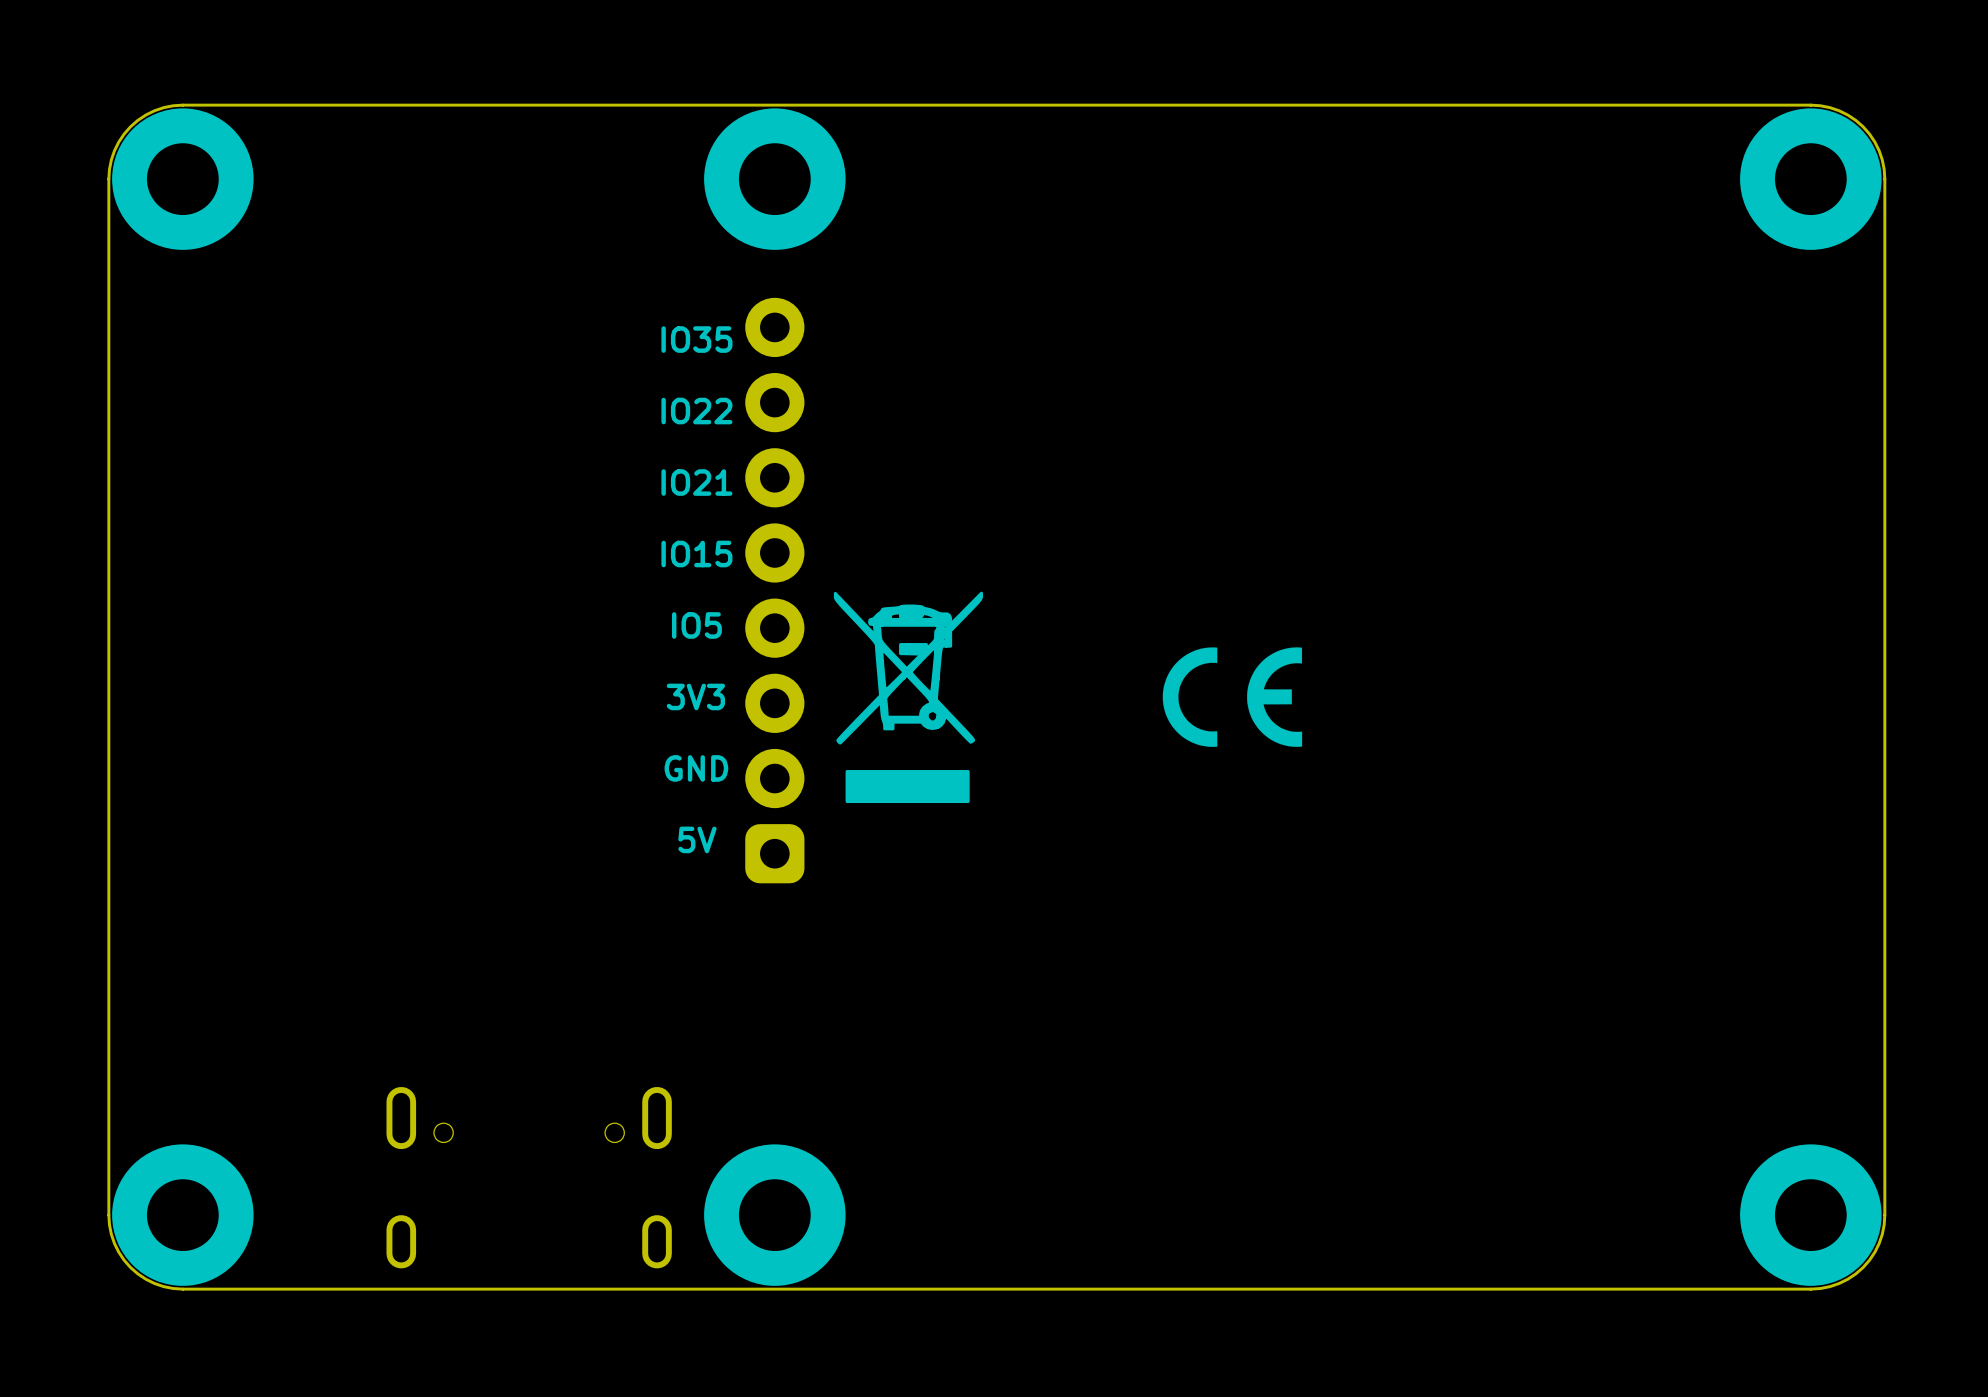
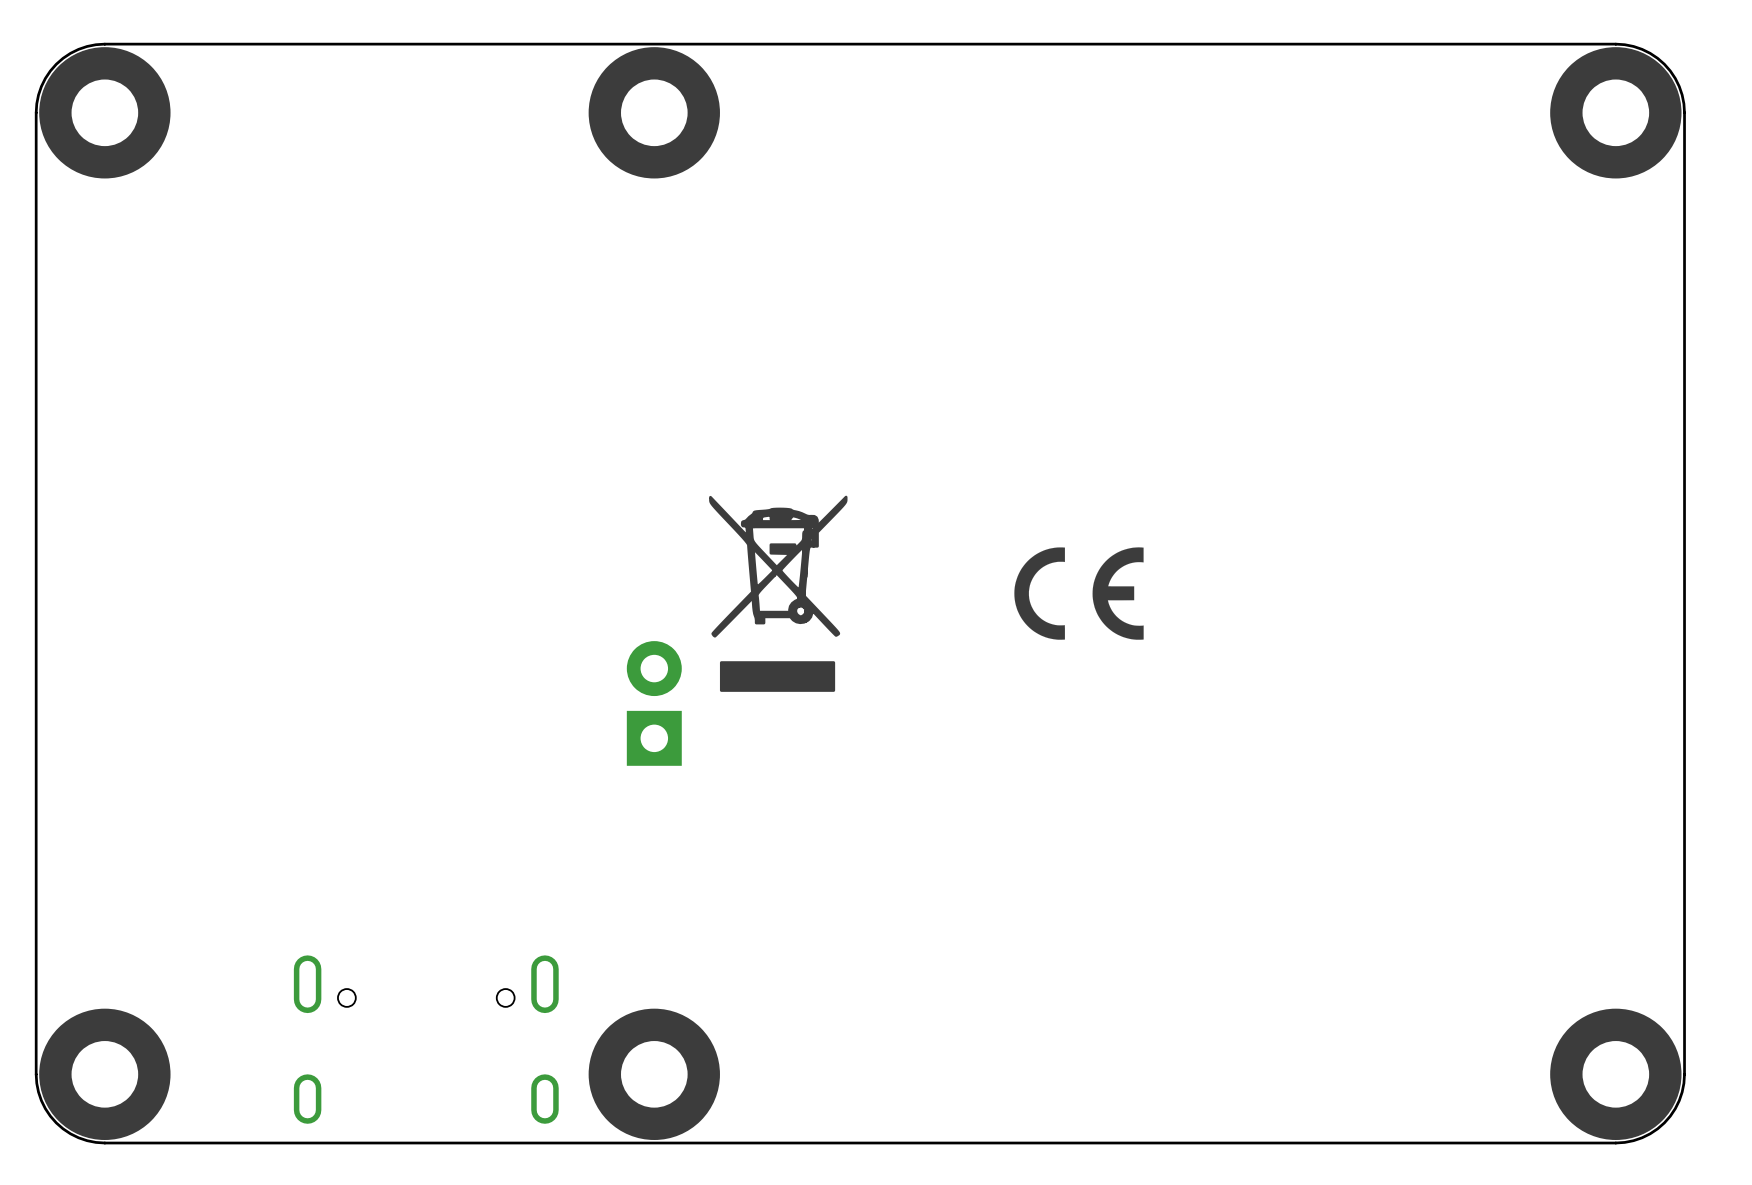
text: IO35 (696, 339) -> none
text: IO22 (696, 411) -> none
text: IO21 (696, 482) -> none
text: IO15 (696, 554) -> none
part: (774, 590) -> none
text: IO5 (696, 625) -> none
text: 3V3 (695, 696) -> none
text: GND (696, 768) -> none
part: none -> (654, 703)
text: 5V (697, 839) -> none

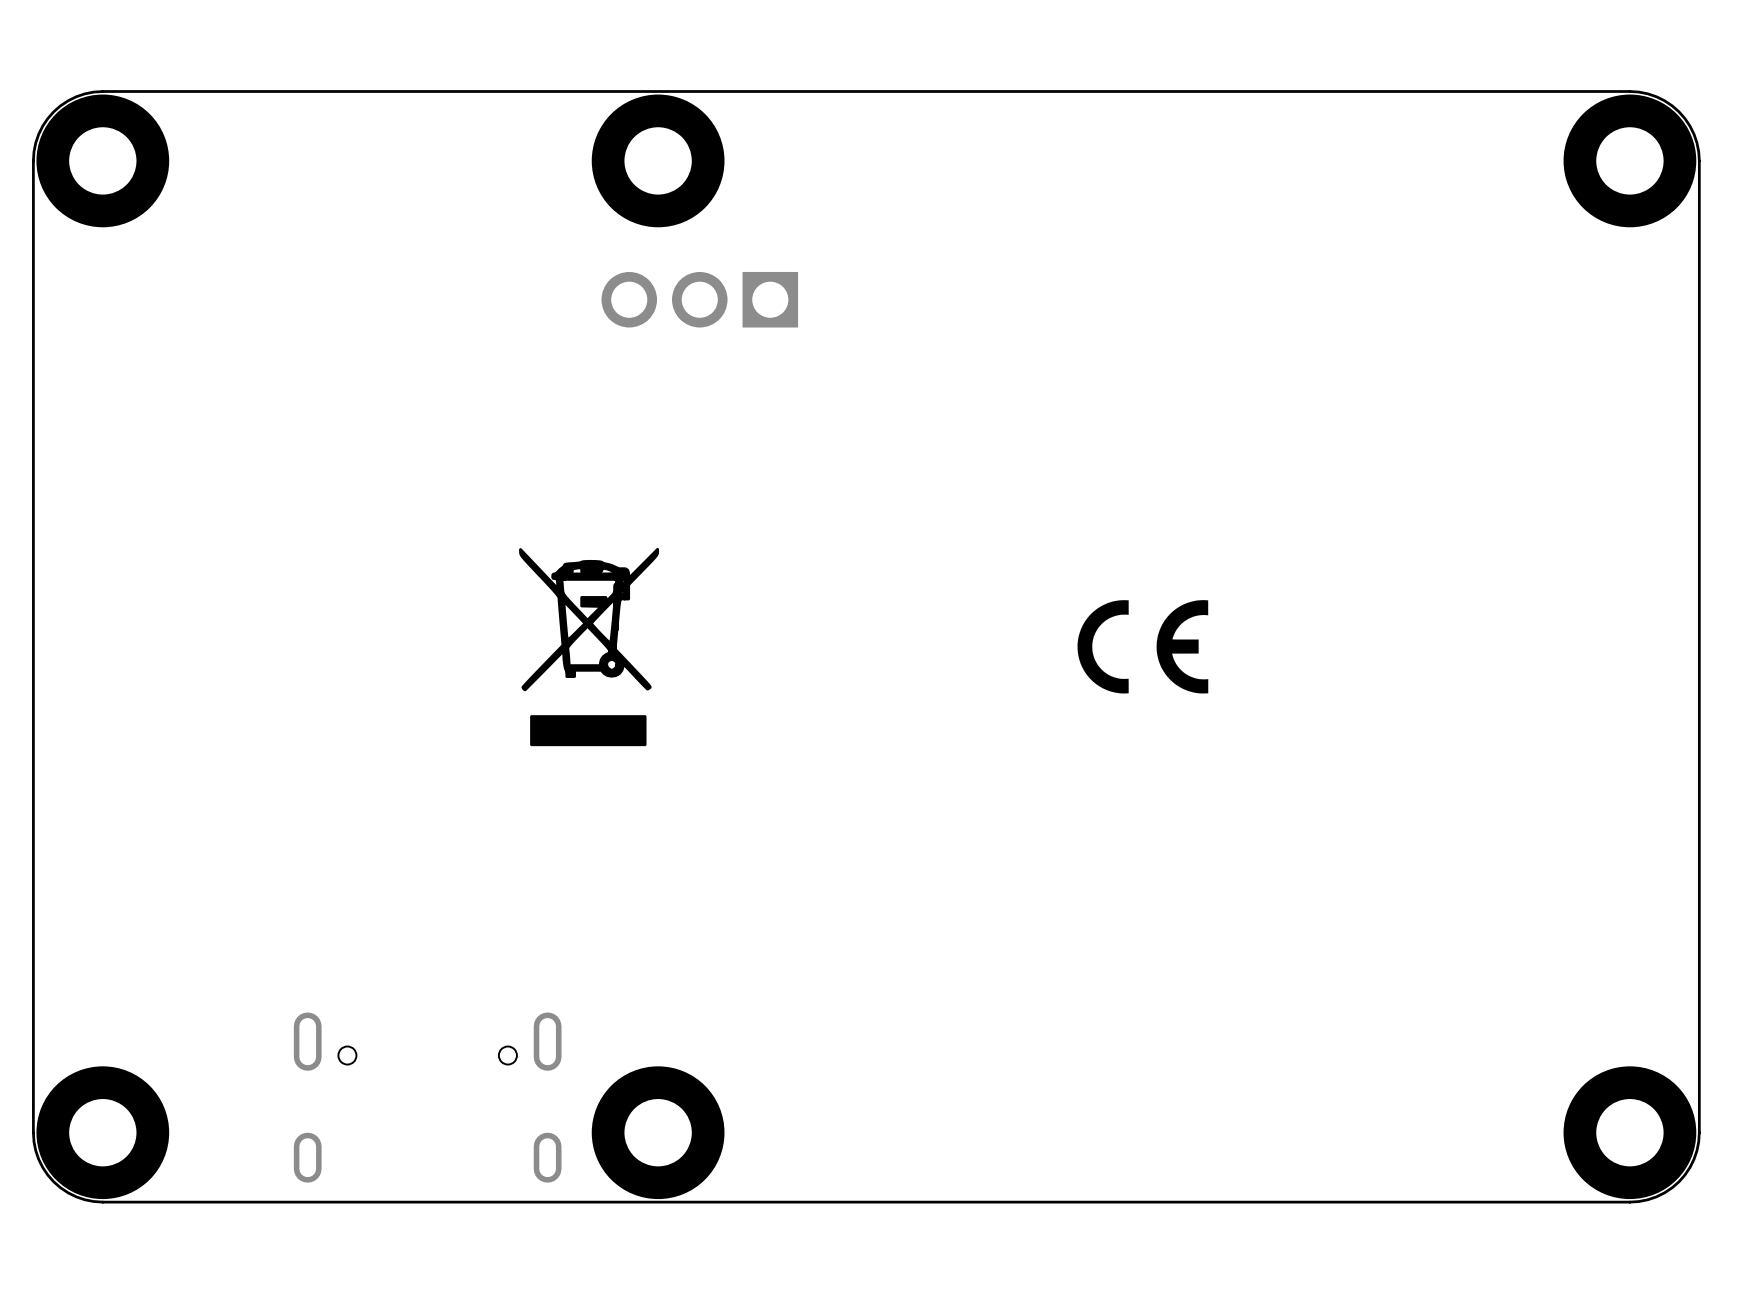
part: none -> (699, 299)
drawing position: (778, 593) -> (589, 647)
drawing position: (1079, 593) -> (1142, 646)
part: (654, 703) -> none

